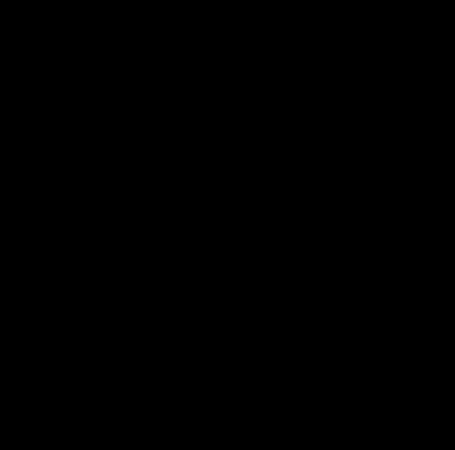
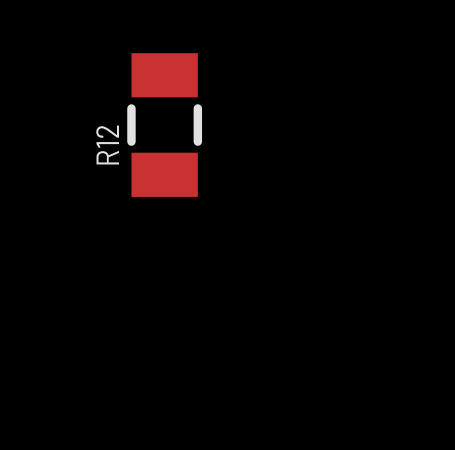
R12: none -> (164, 125)

